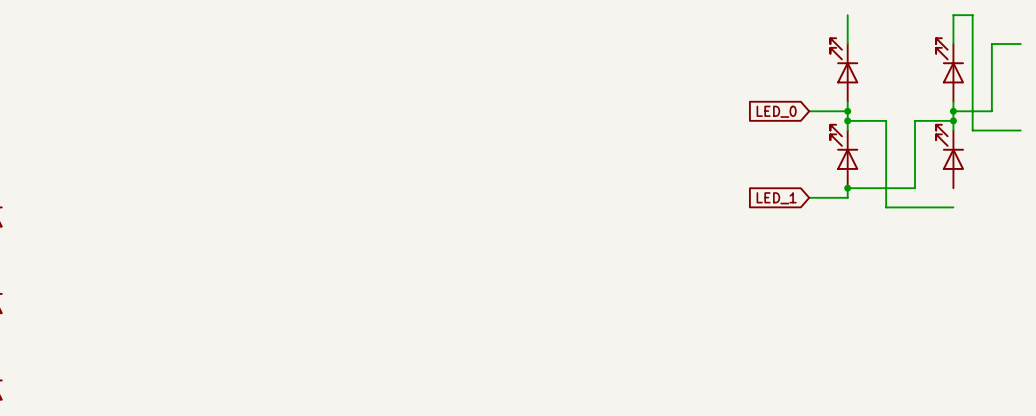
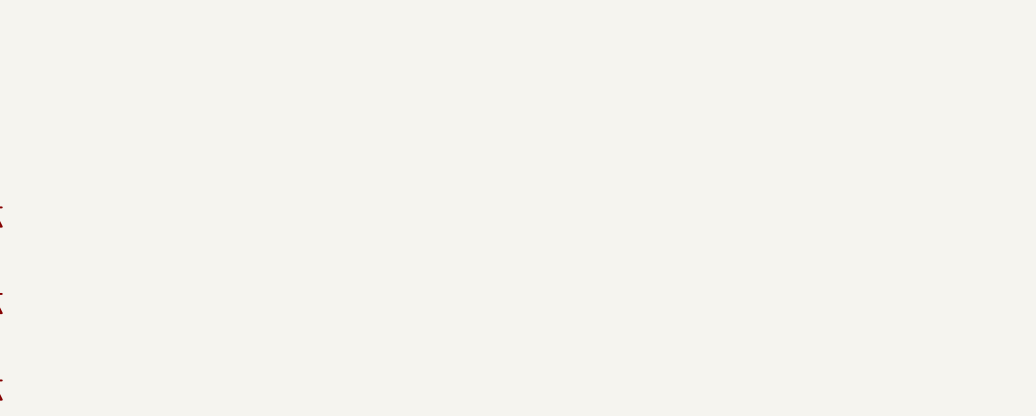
wire: (847, 15) (847, 44) -> none
wire: (953, 44) (953, 15) (972, 15) (972, 130) (1020, 130) -> none
wire: (1020, 44) (991, 44) (991, 111) (953, 111) -> none
part: (844, 69) -> none
part: (950, 69) -> none
wire: (847, 101) (847, 130) -> none
wire: (953, 101) (953, 130) -> none
global label: LED_0 (776, 111) -> none
wire: (809, 111) (847, 111) -> none
junction: (847, 111) -> none
junction: (953, 111) -> none
wire: (847, 120) (886, 120) (886, 207) (953, 207) -> none
junction: (847, 120) -> none
wire: (953, 120) (914, 120) (914, 188) (847, 188) (847, 197) (809, 197) -> none
junction: (953, 120) -> none
part: (844, 156) -> none
part: (950, 156) -> none
junction: (847, 188) -> none
global label: LED_1 (776, 198) -> none

